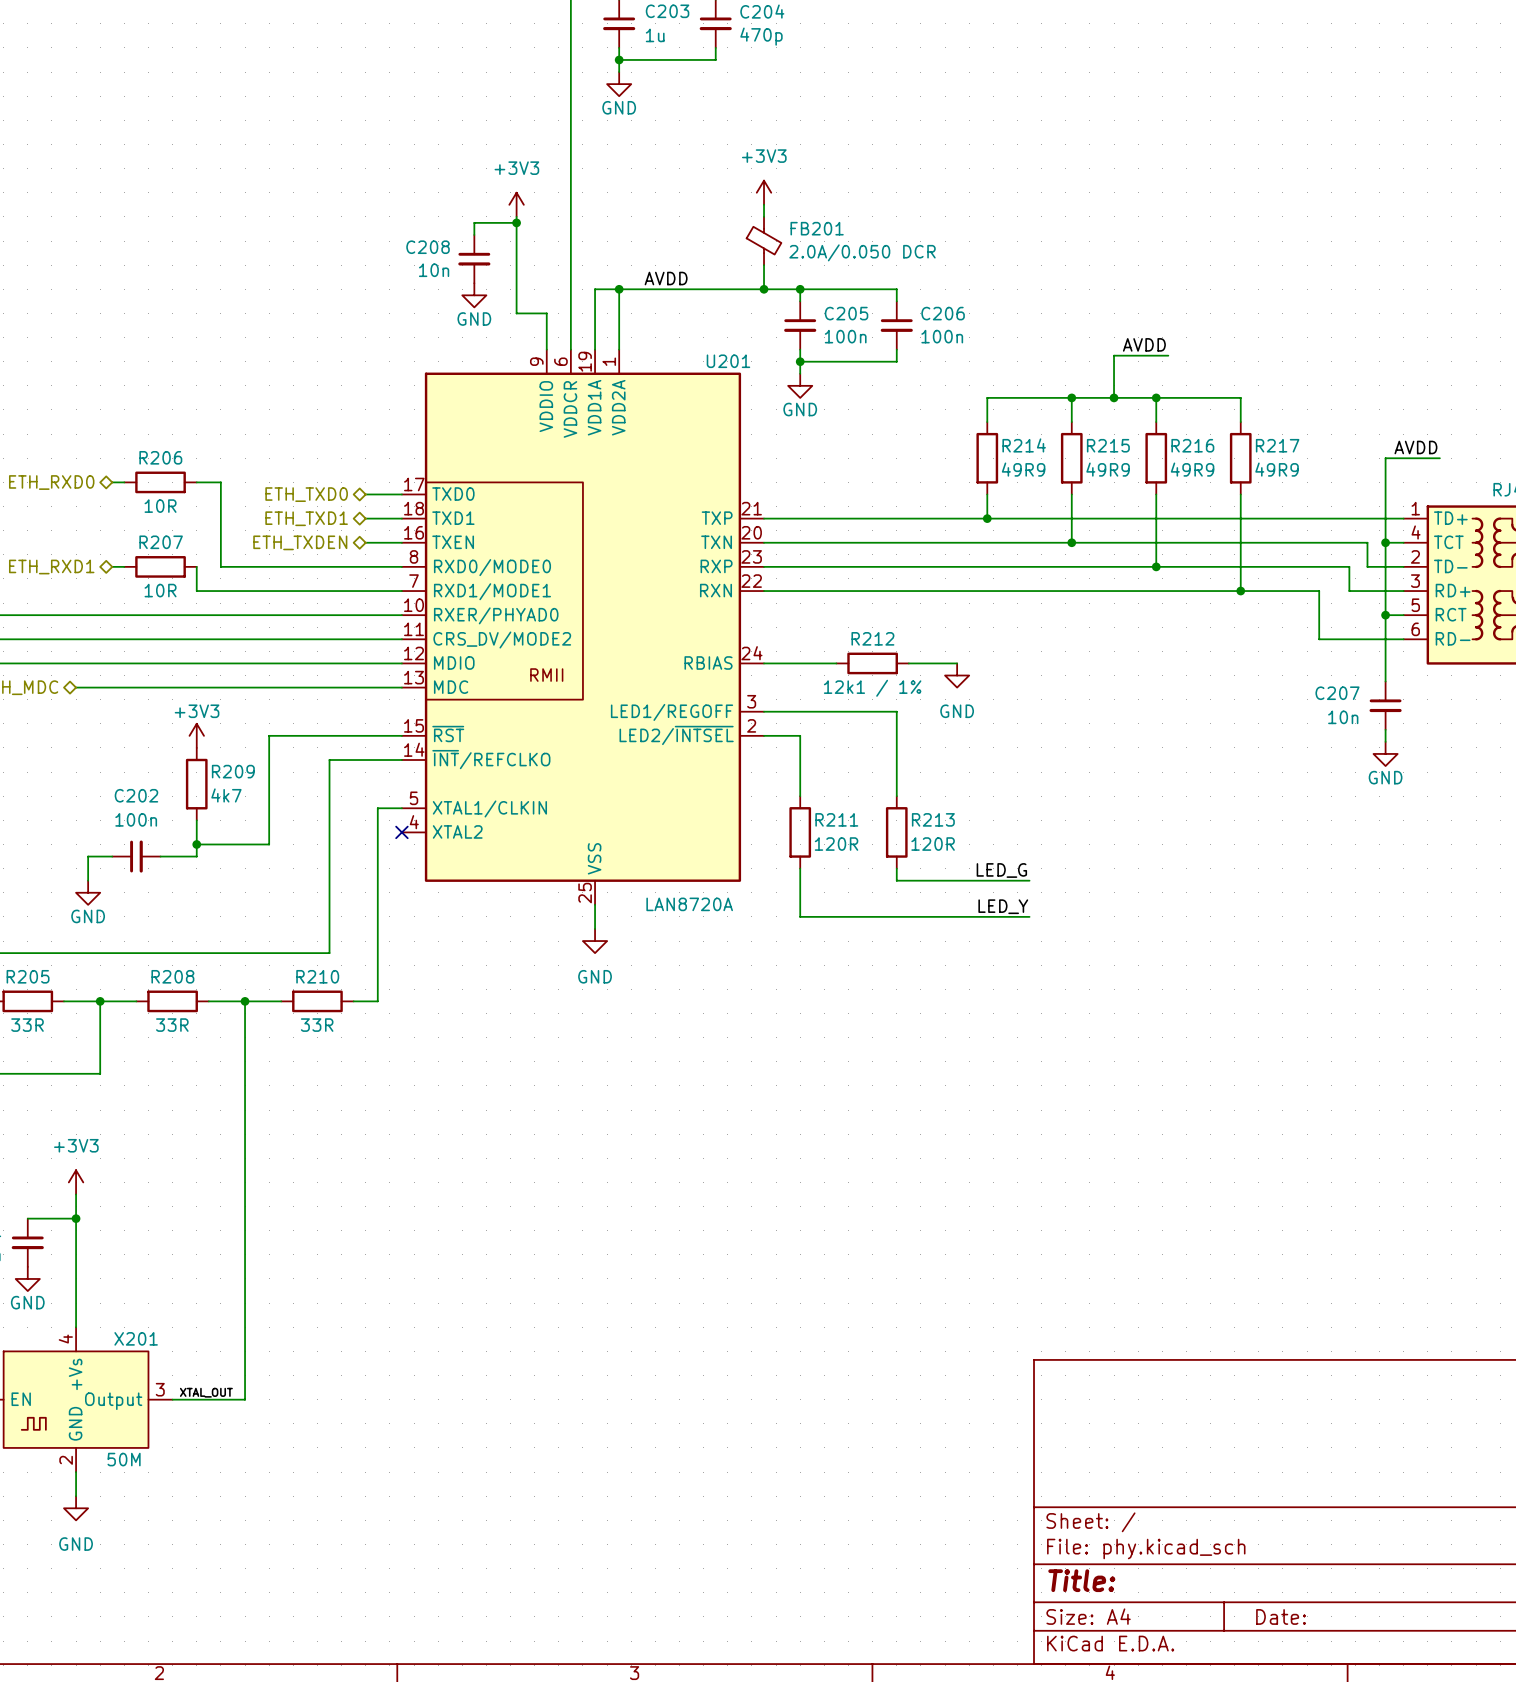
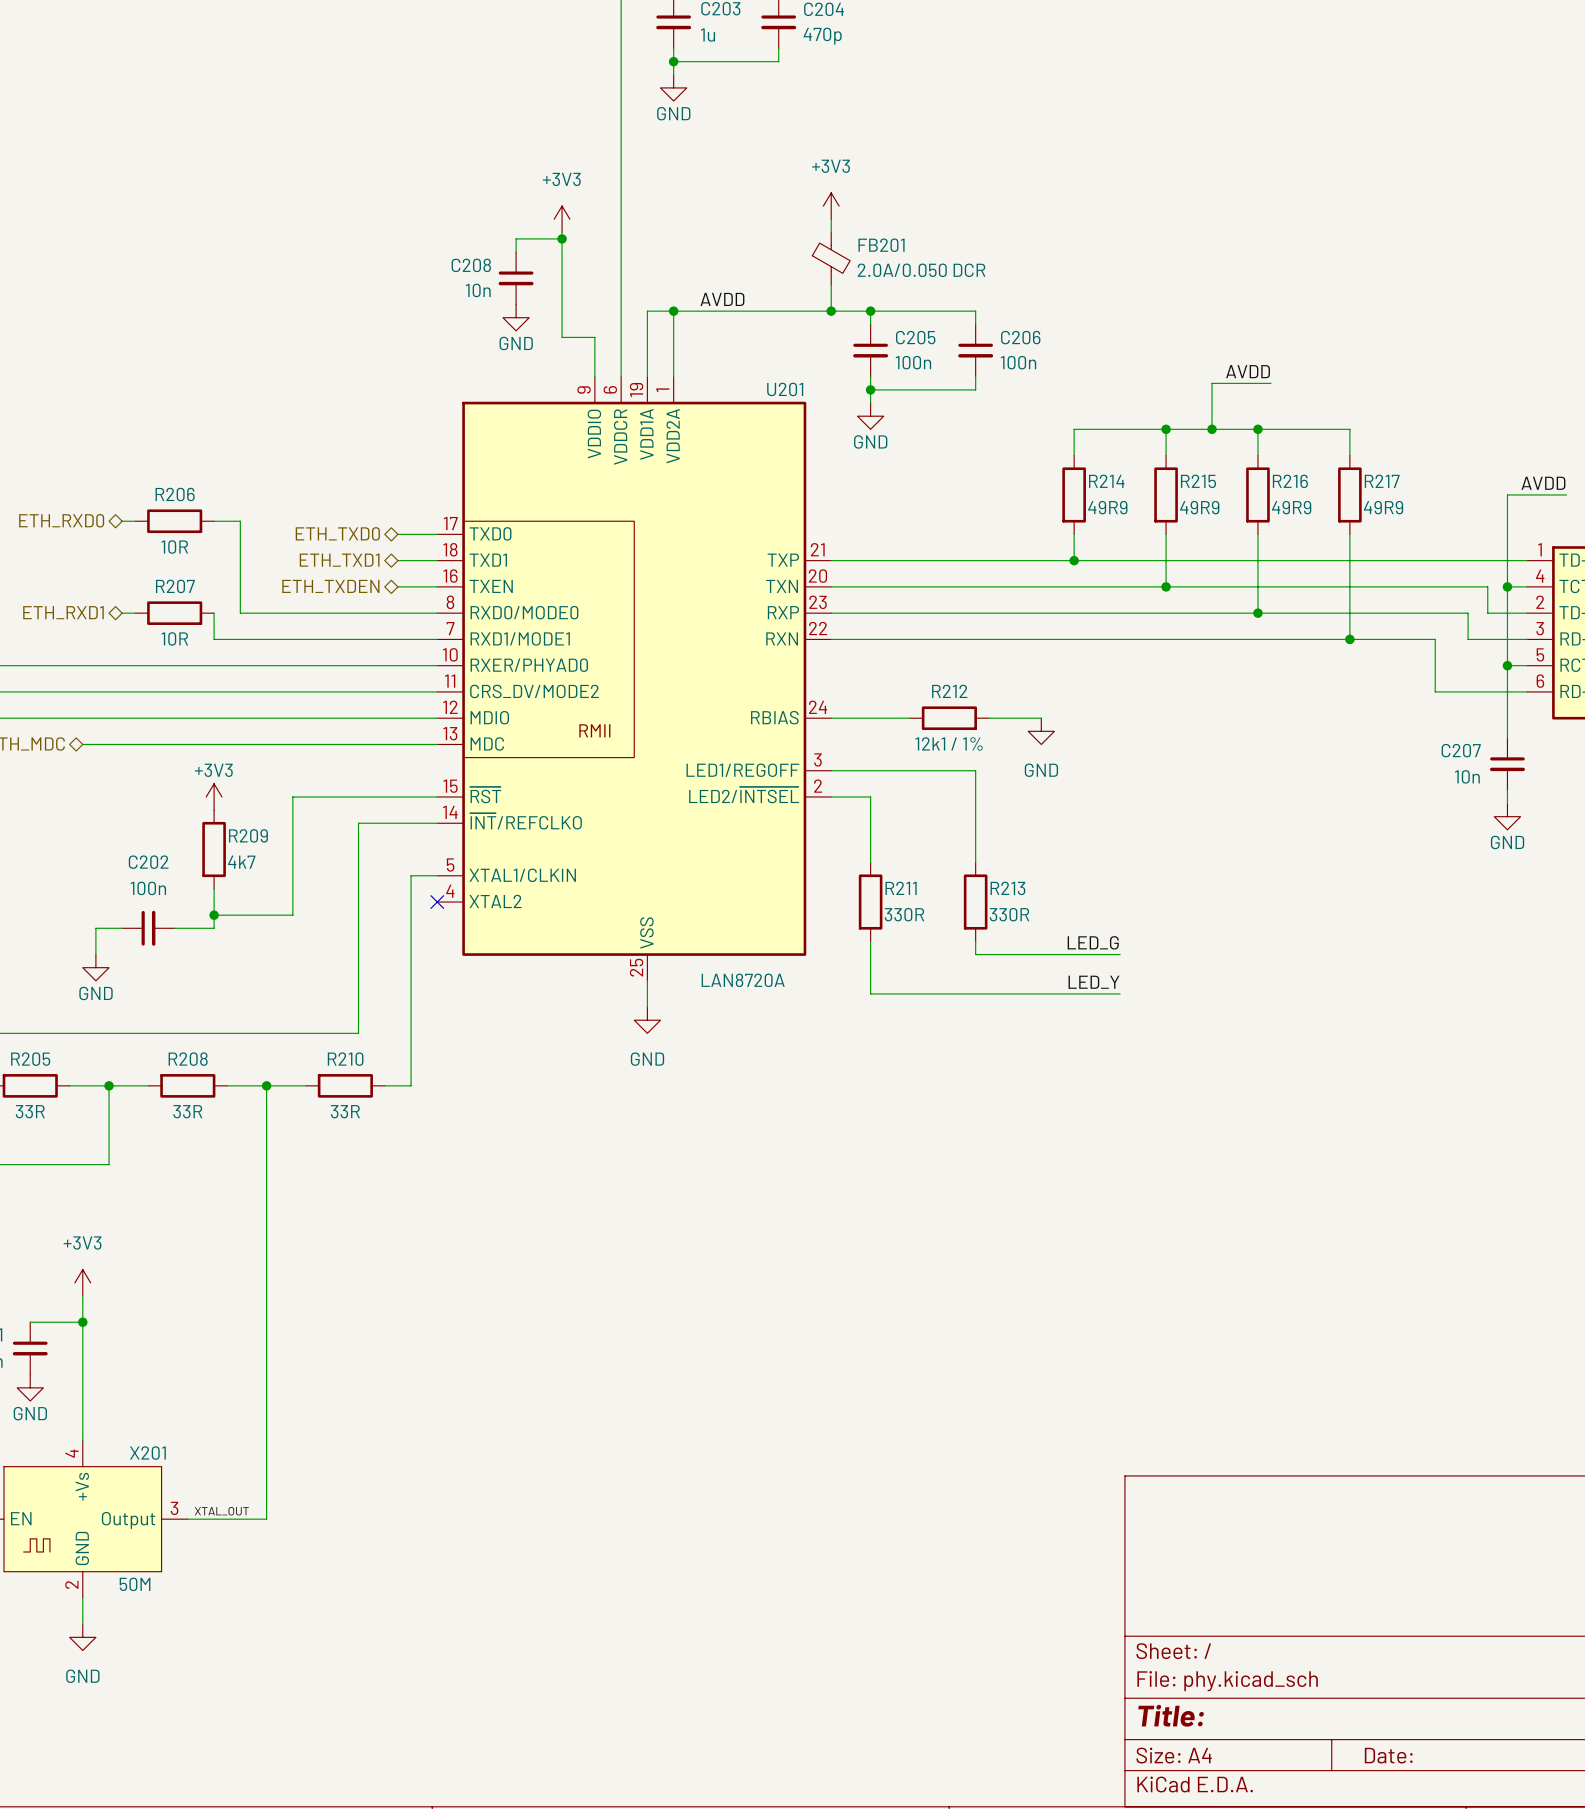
R211 value: 120R (836, 844) -> 330R (904, 914)
R213 value: 120R (933, 844) -> 330R (1009, 914)

